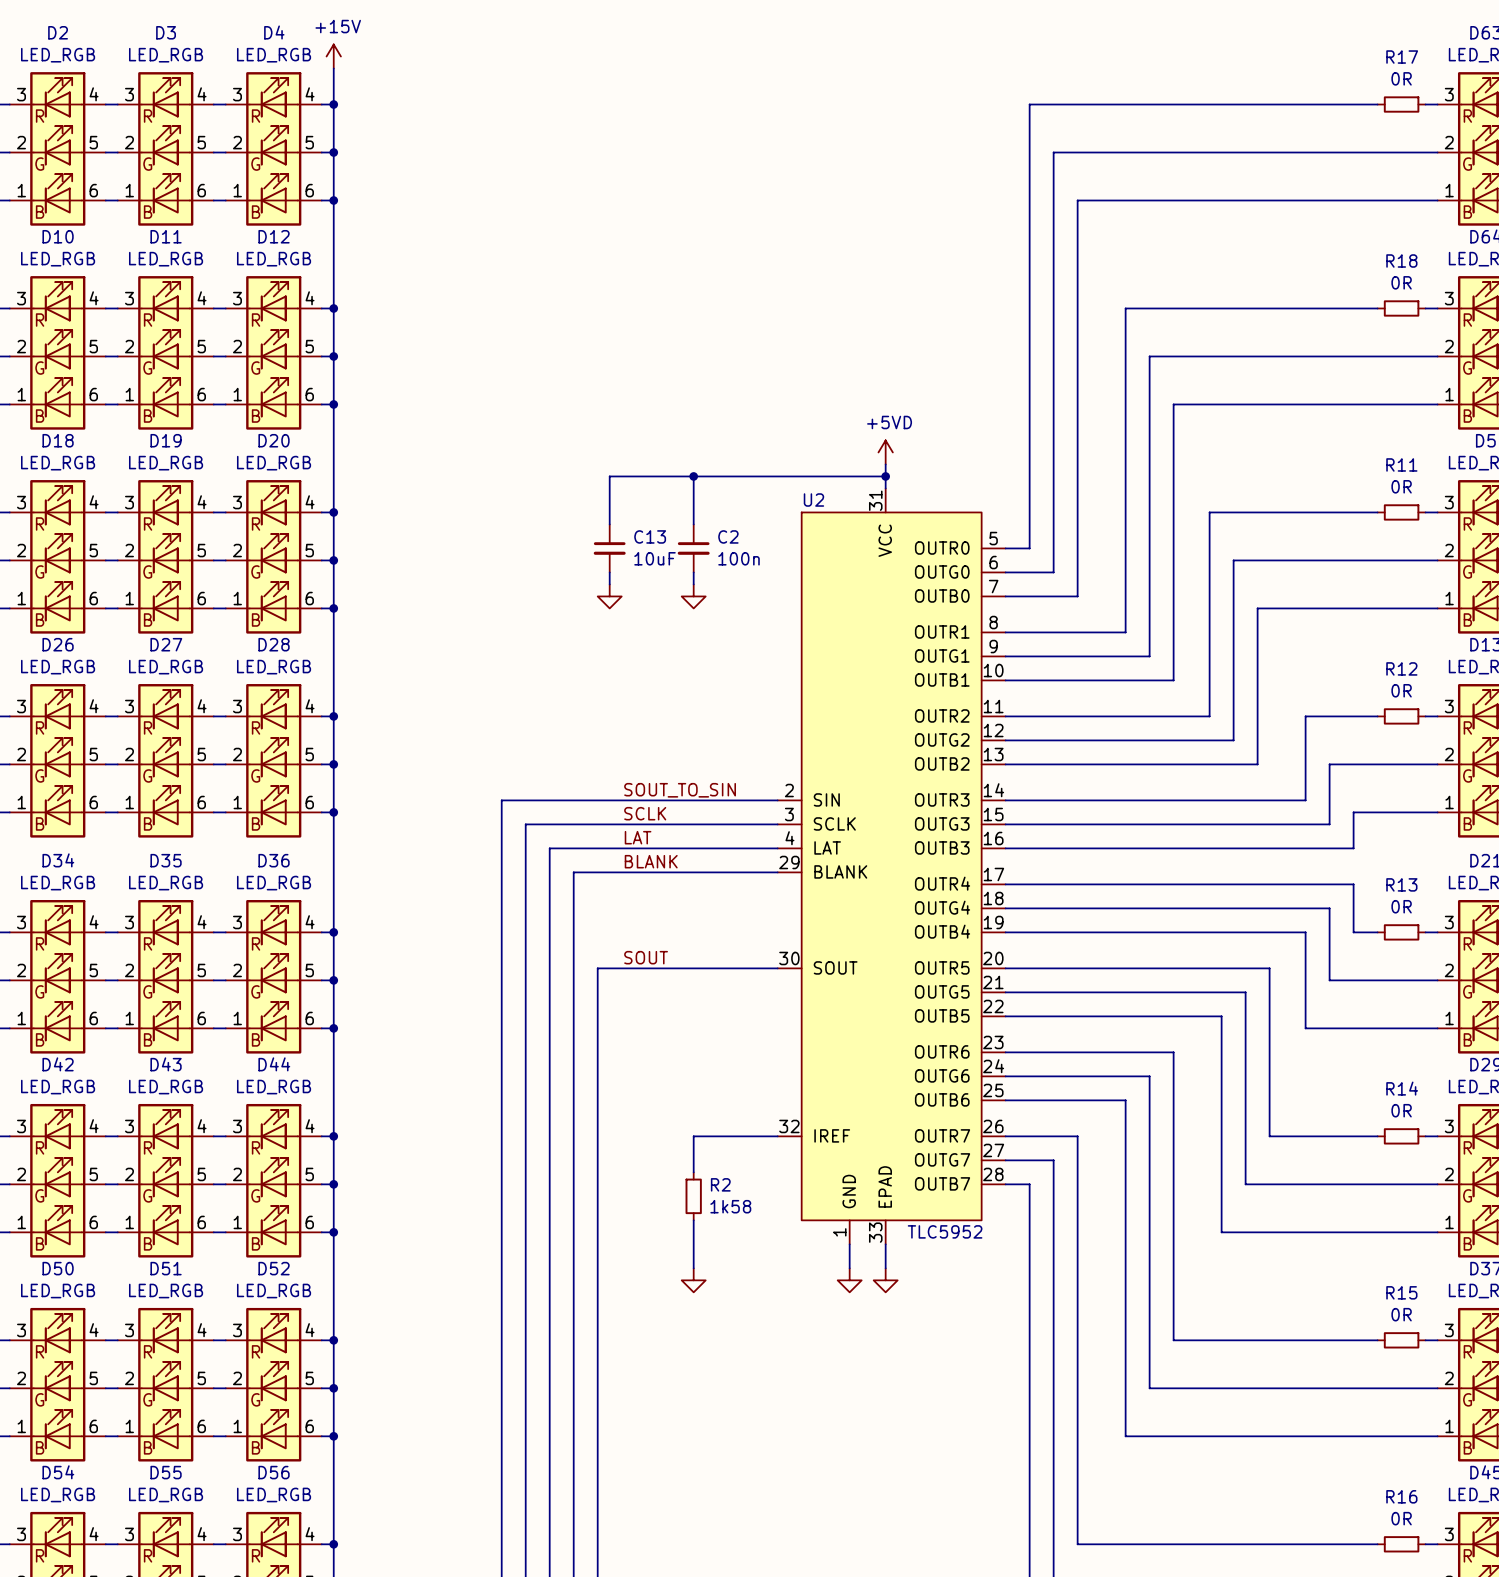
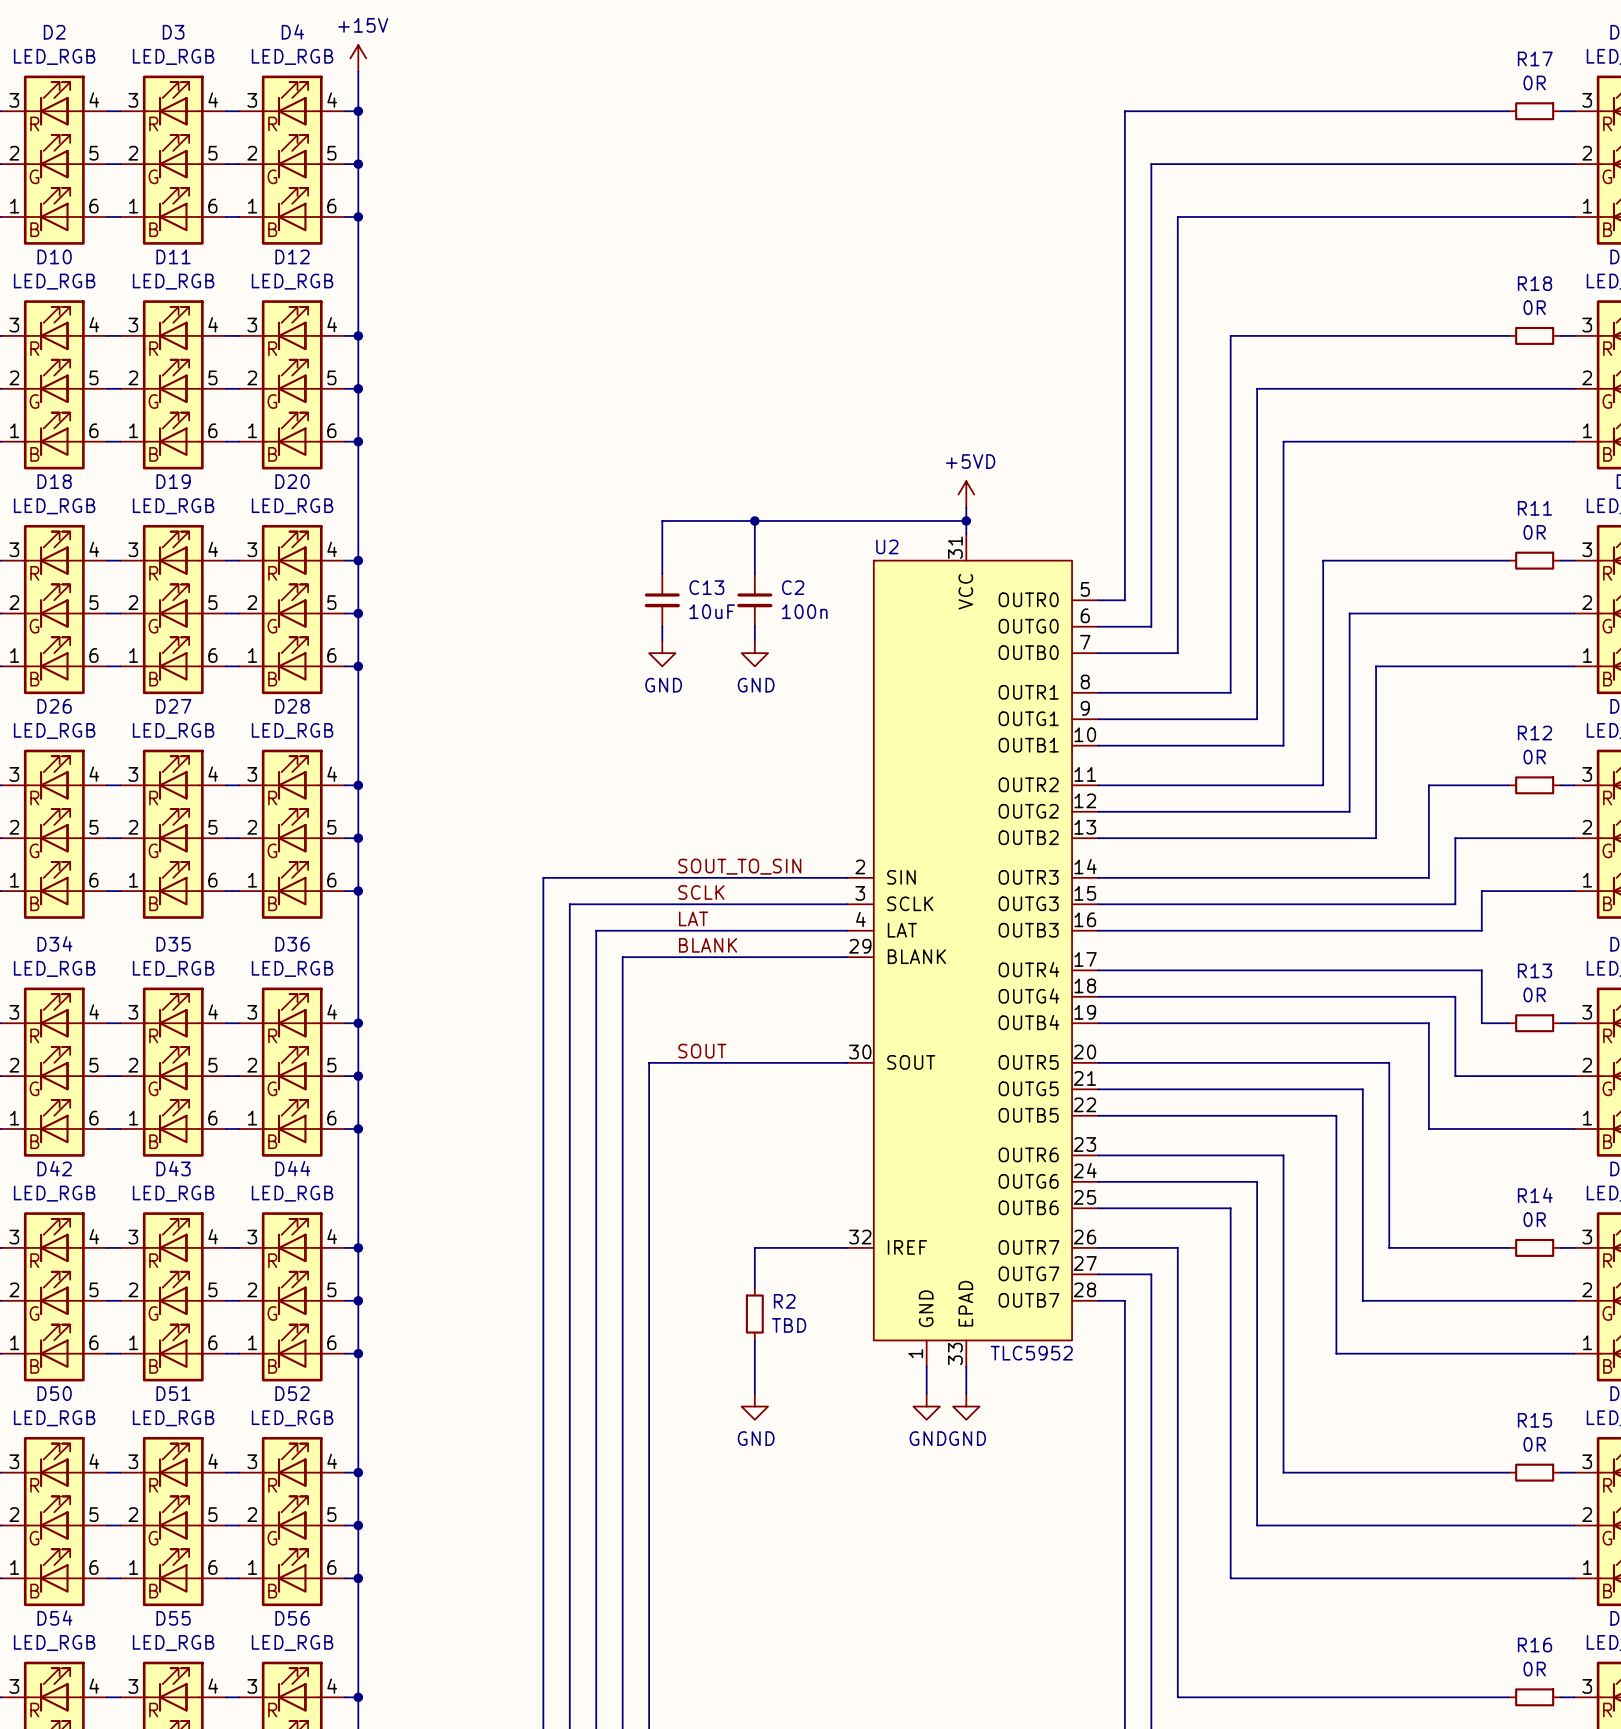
power symbol text: none -> GND (663, 685)
power symbol text: none -> GND (756, 685)
R2 value: 1k58 (730, 1206) -> TBD (789, 1325)
power symbol text: none -> GND (756, 1438)
power symbol text: none -> GND (927, 1438)
power symbol text: none -> GND (967, 1438)

